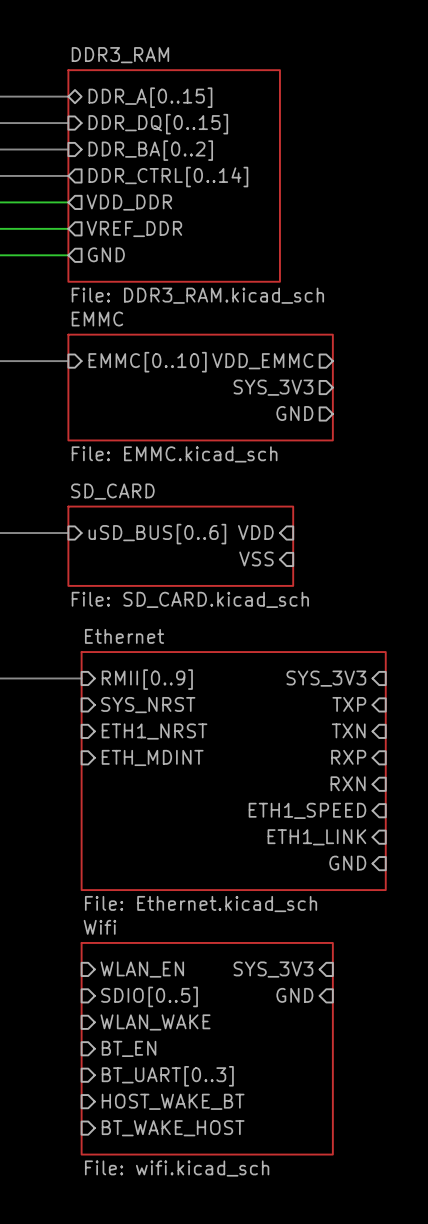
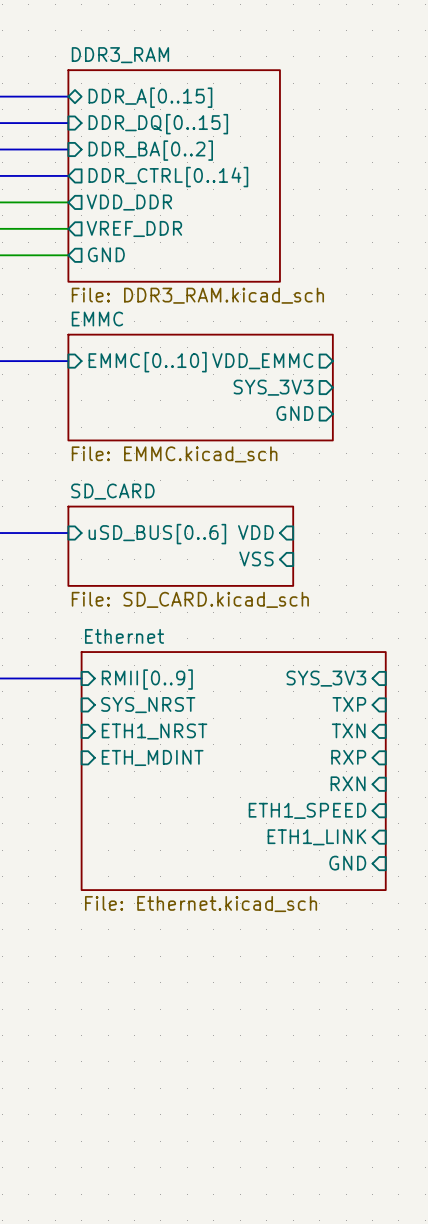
sheet pin: WLAN_EN (142, 969) -> none
sheet pin: SYS_3V3 (273, 969) -> none
sheet pin: GND (294, 995) -> none
sheet pin: SDIO[0..5] (149, 996) -> none
sheet pin: WLAN_WAKE (155, 1022) -> none
sheet pin: BT_EN (129, 1048) -> none
sheet Wifi: File: wifi.kicad_sch (207, 1048) -> none
sheet pin: BT_UART[0..3] (167, 1076) -> none
sheet pin: HOST_WAKE_BT (173, 1101) -> none
sheet pin: BT_WAKE_HOST (173, 1128) -> none

